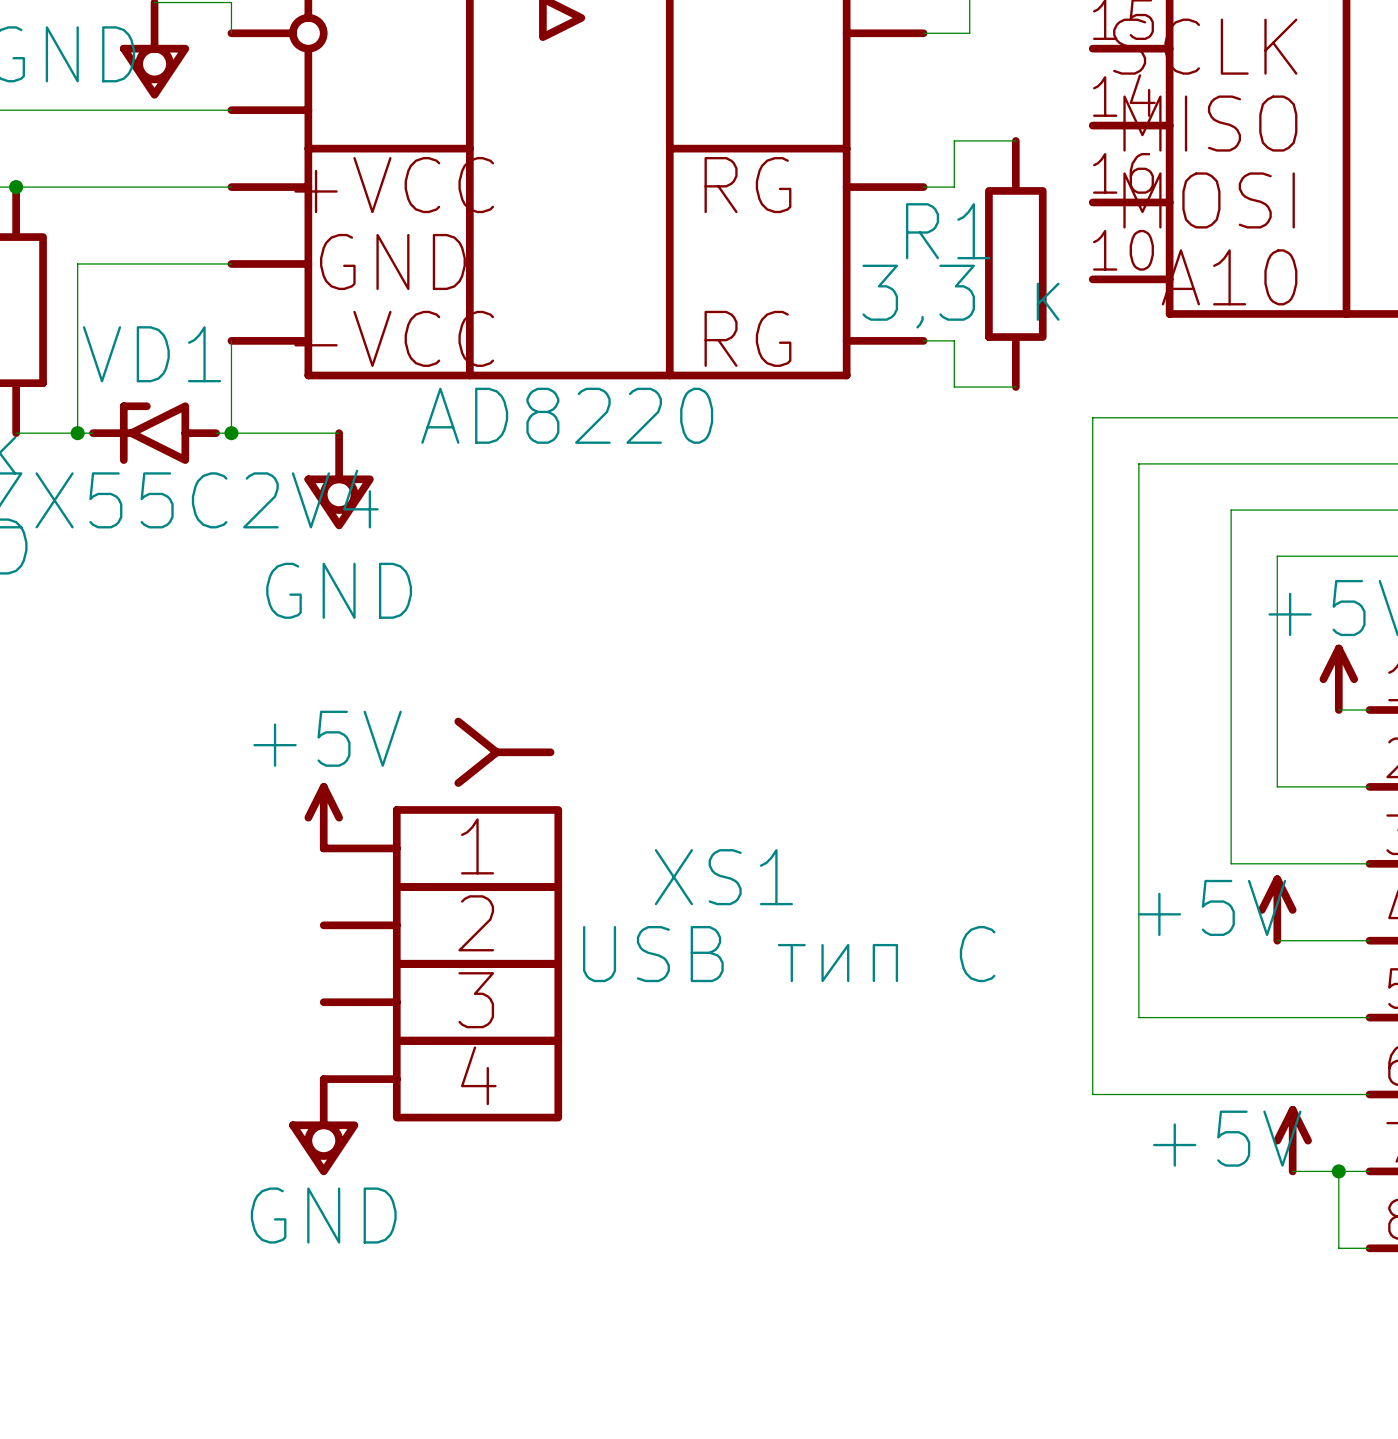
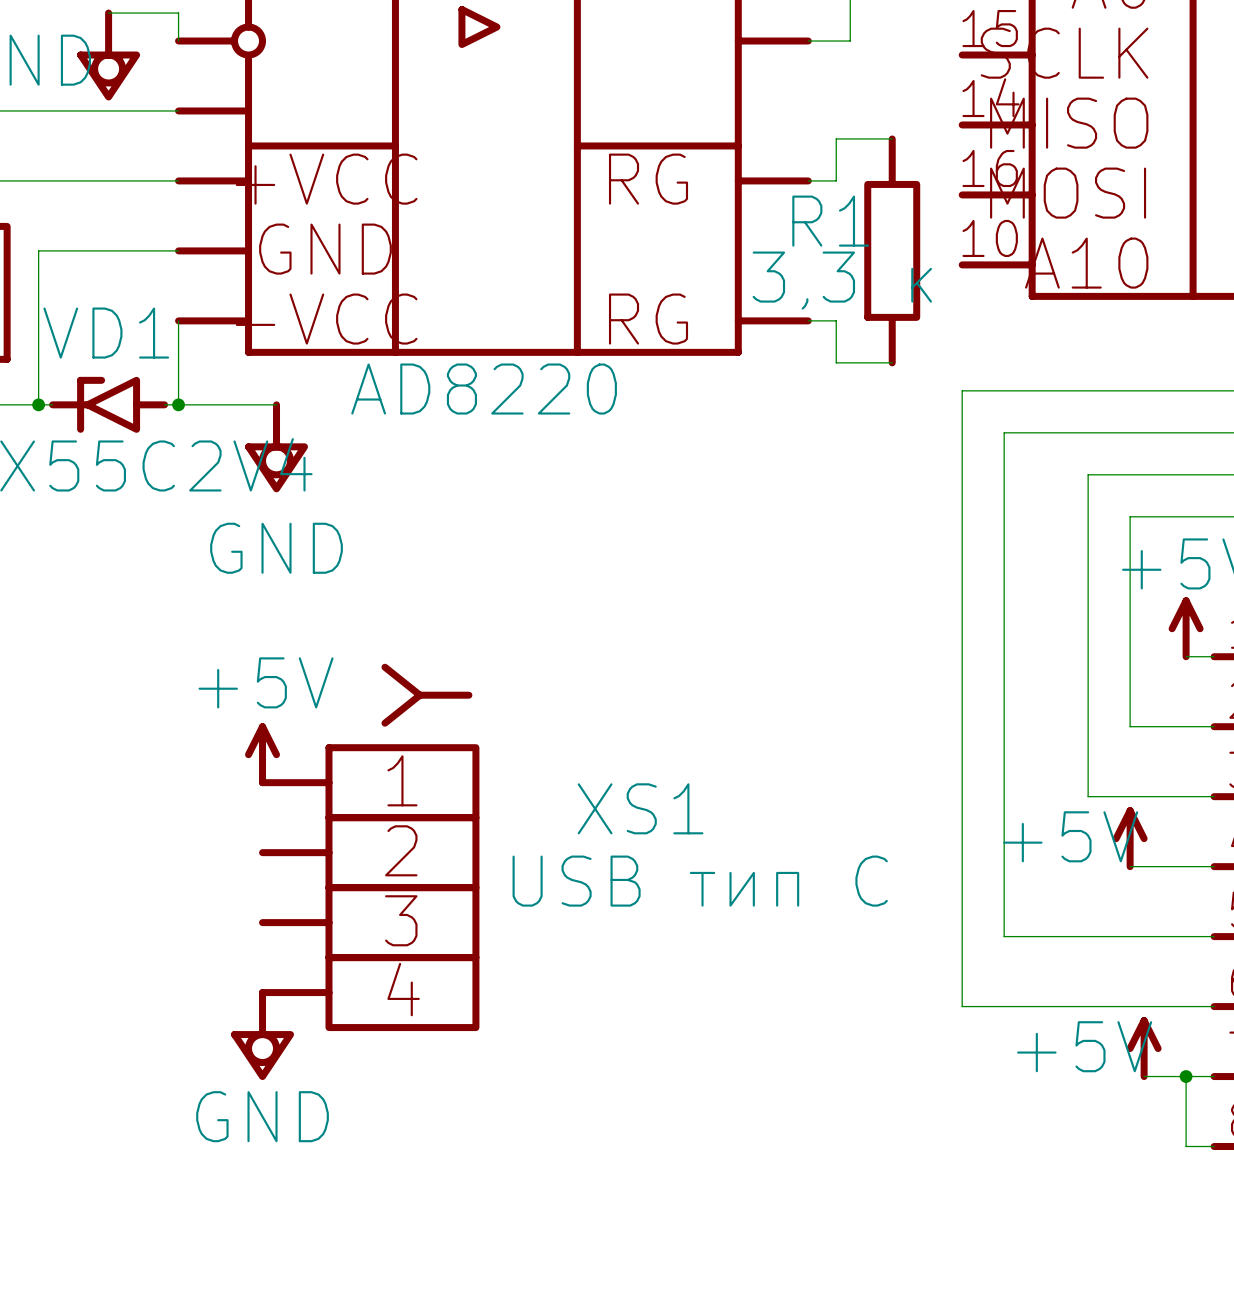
XS1 name position: XS1 (723, 877) -> XS1 (640, 808)
XS1 value position: USB тип C (789, 954) -> USB тип C (700, 881)

